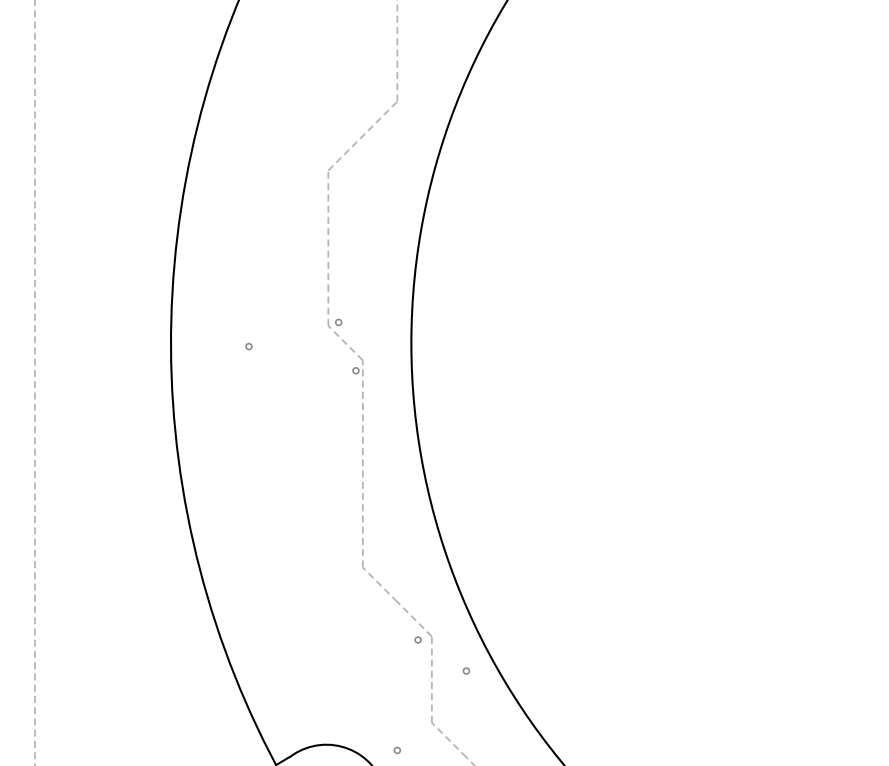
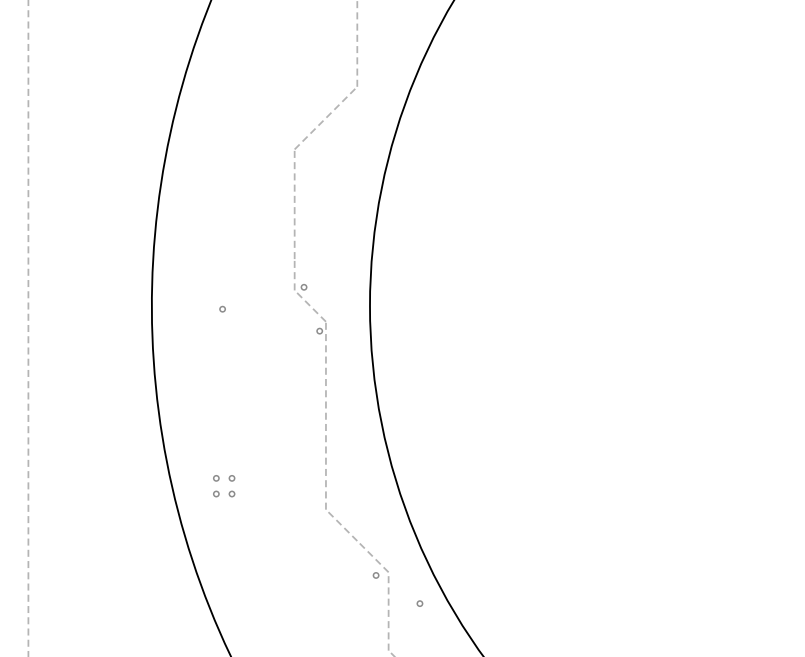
part: none -> (216, 478)
part: none -> (232, 478)
part: none -> (216, 494)
part: none -> (232, 494)

